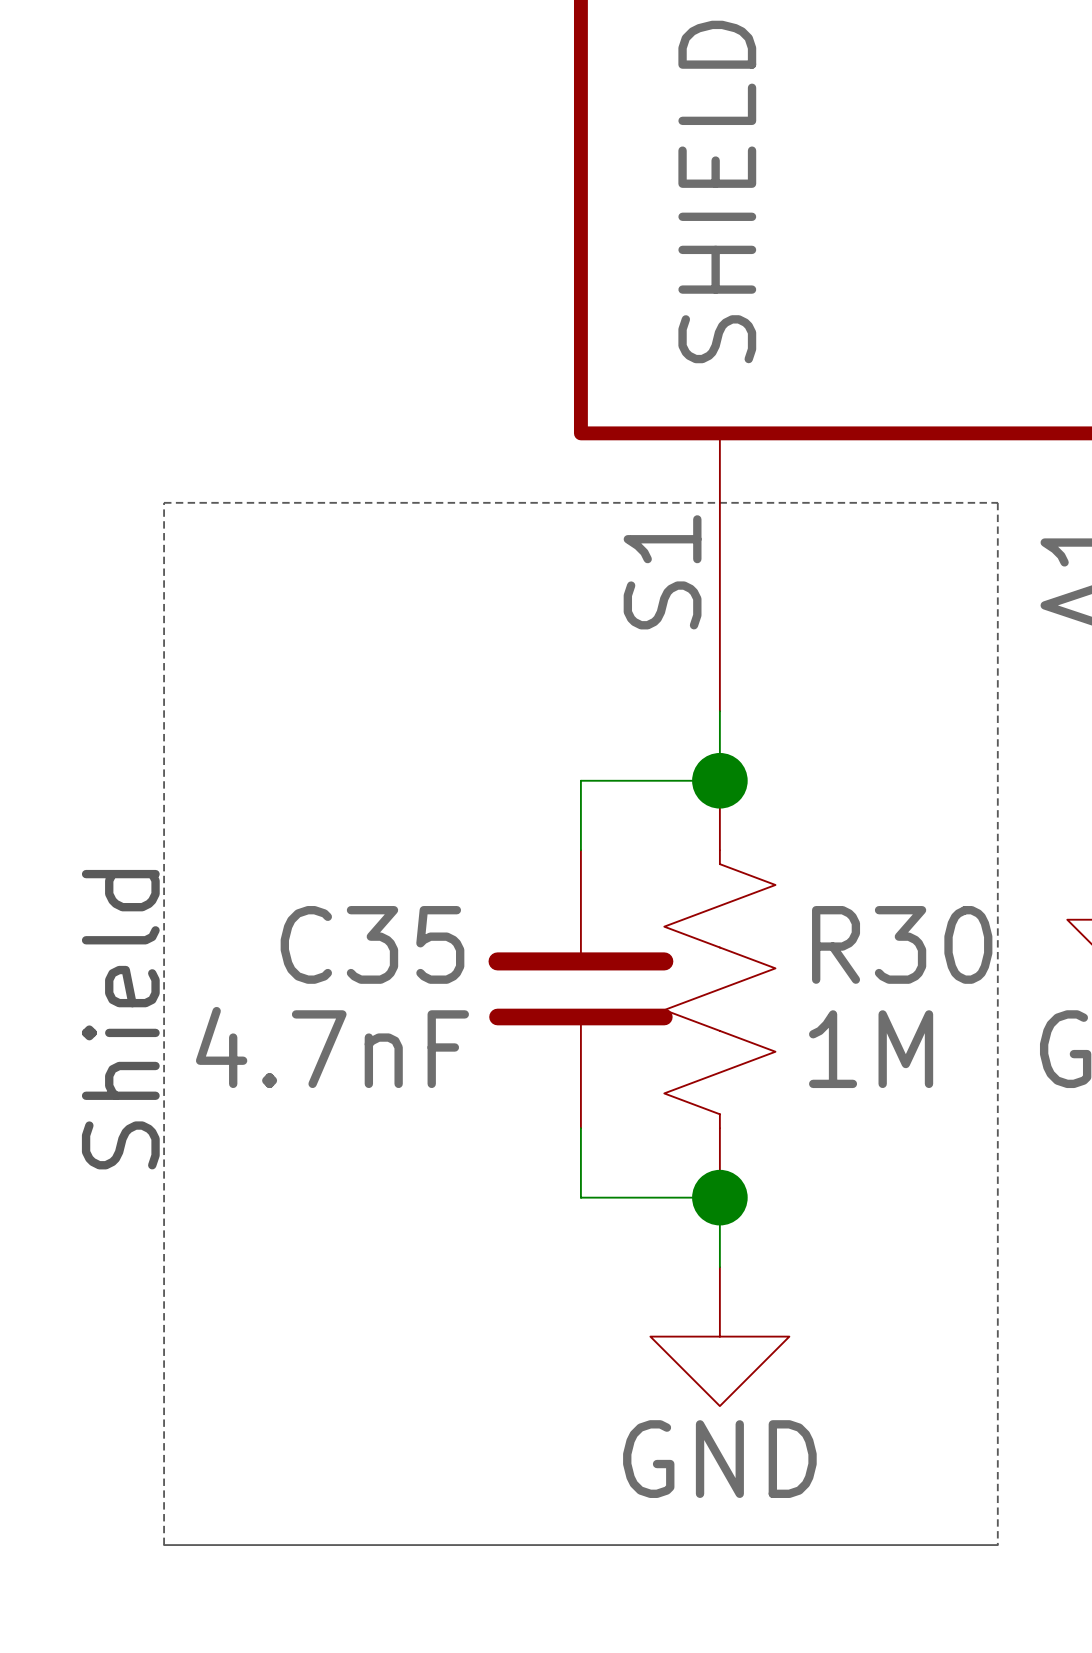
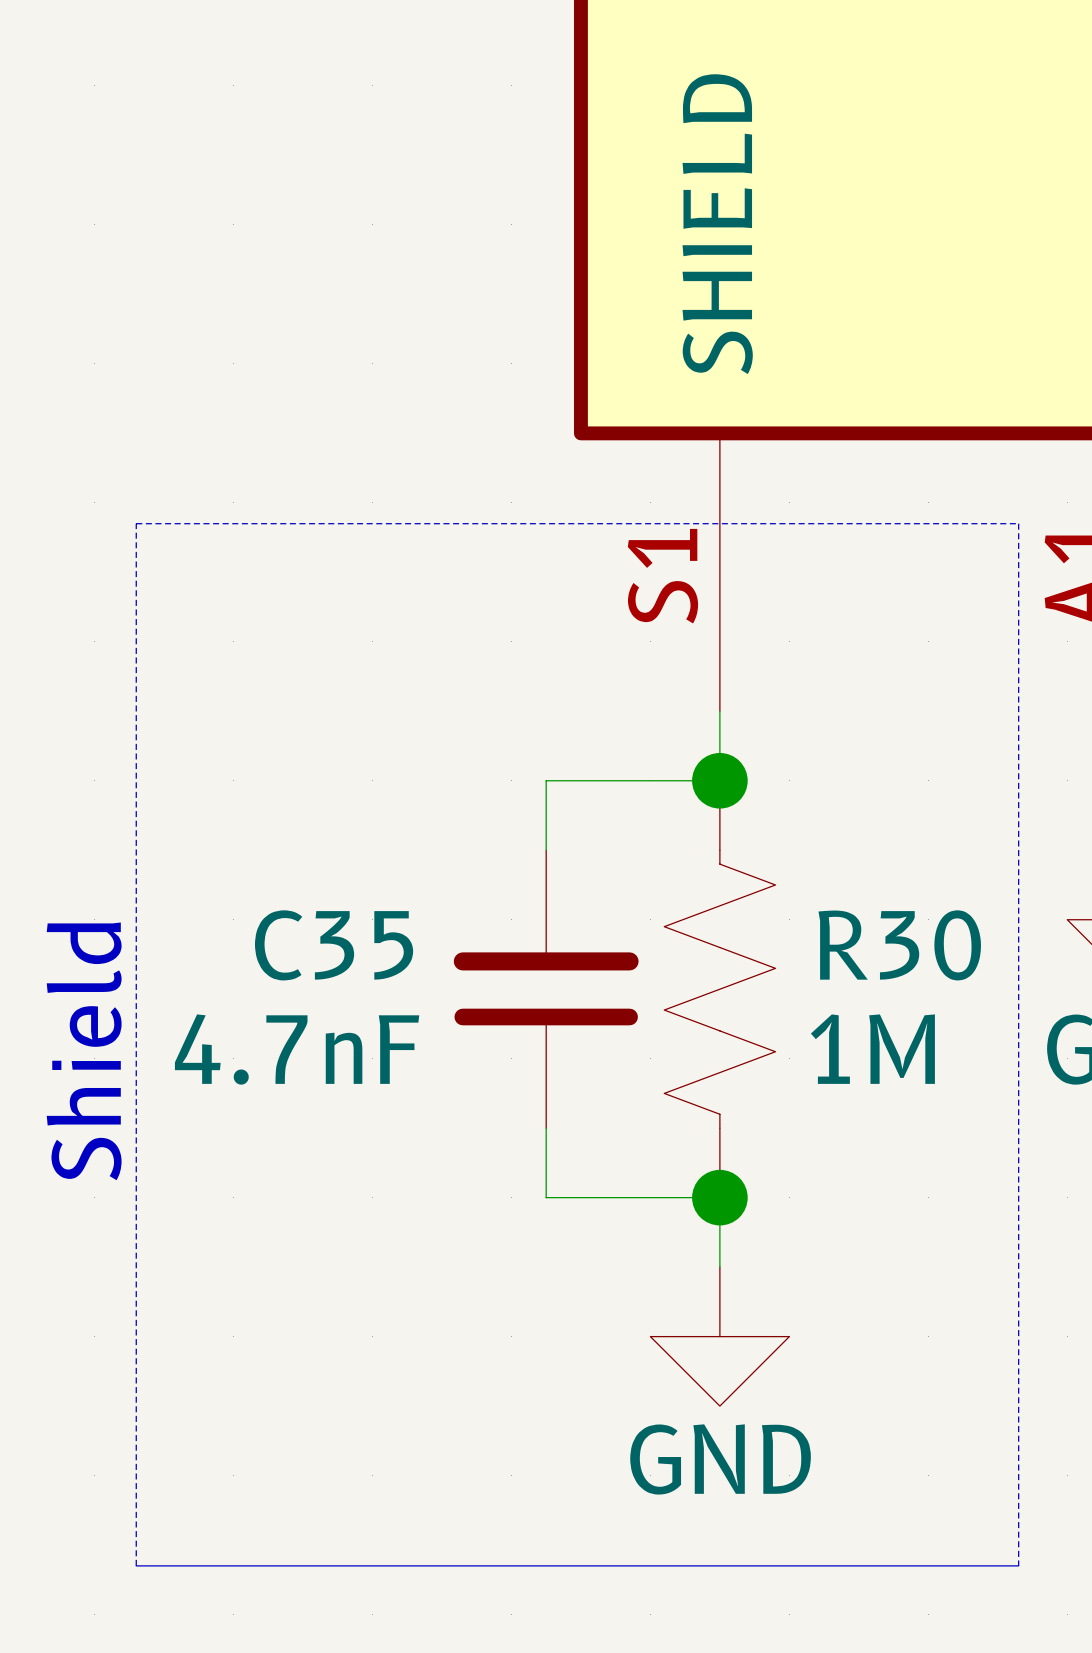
line: (164, 502) (164, 1545) (997, 1545) (997, 502) (164, 502) -> (136, 523) (136, 1565) (1018, 1565) (1018, 523) (136, 523)
wire: (580, 780) (580, 850) -> (580, 780) (546, 780) (546, 850)
C35 position: (580, 989) -> (546, 989)
text position: Shield (120, 1019) -> Shield (84, 1051)
wire: (580, 1128) (580, 1197) -> (546, 1128) (546, 1197) (580, 1197)

